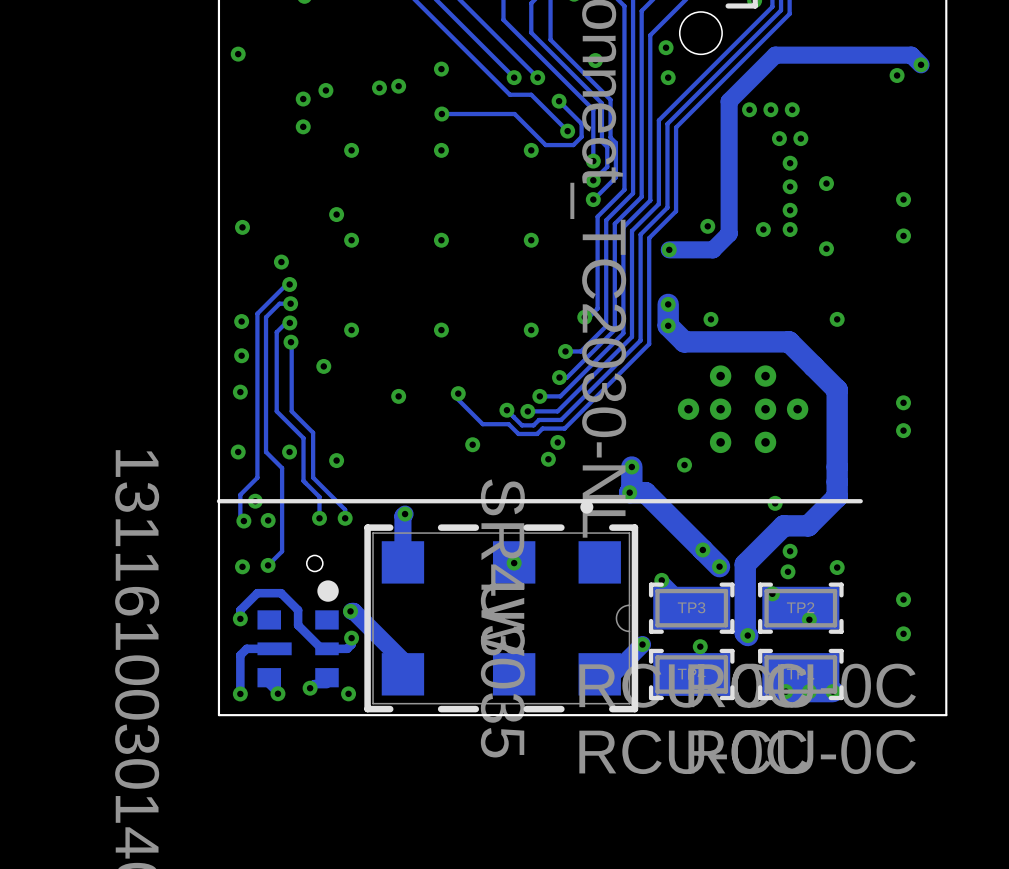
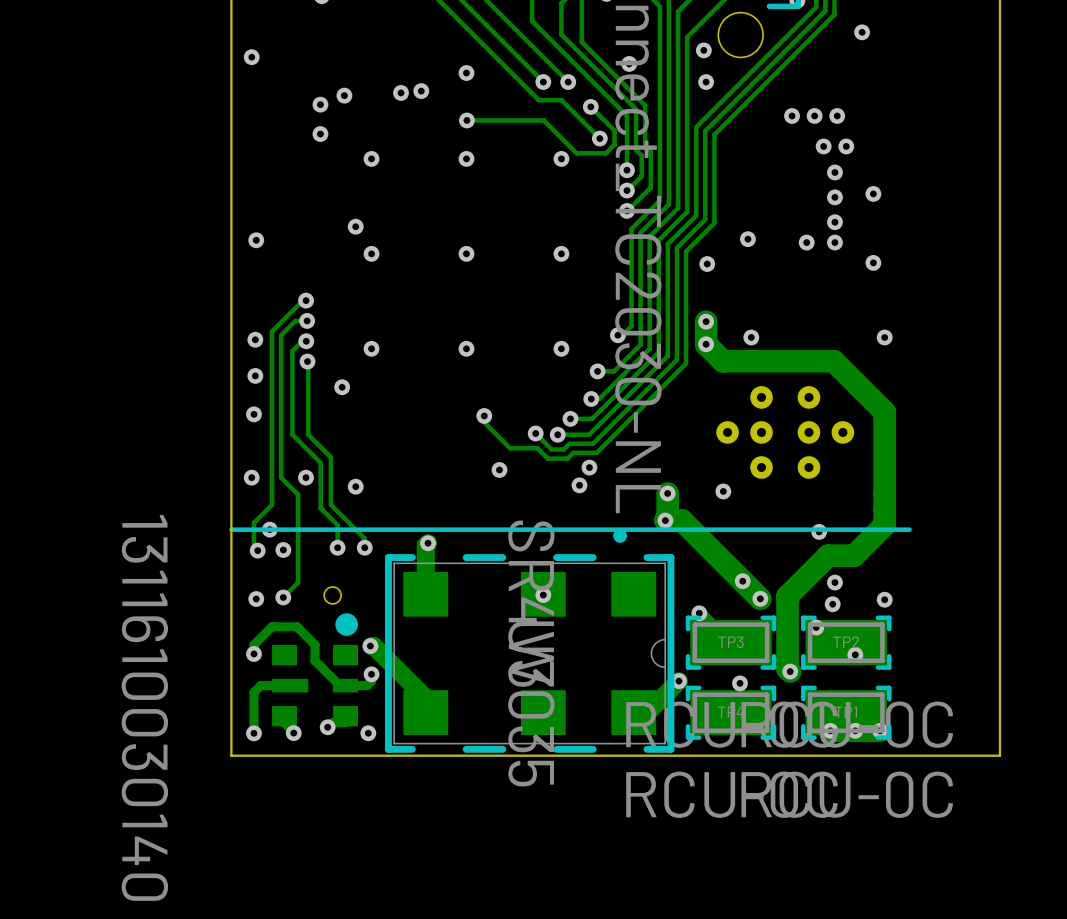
via: none -> (862, 32)
track: (921, 64) (911, 55) (775, 55) (729, 101) (729, 233) (713, 249) (669, 249) -> none
via: (921, 64) -> none
via: (897, 75) -> none
via: (903, 199) -> none
via: (903, 235) -> none
via: (281, 262) -> none
via: (398, 396) -> none
via: (903, 402) -> none
via: (903, 430) -> none
via: (903, 599) -> none
via: (903, 633) -> none

